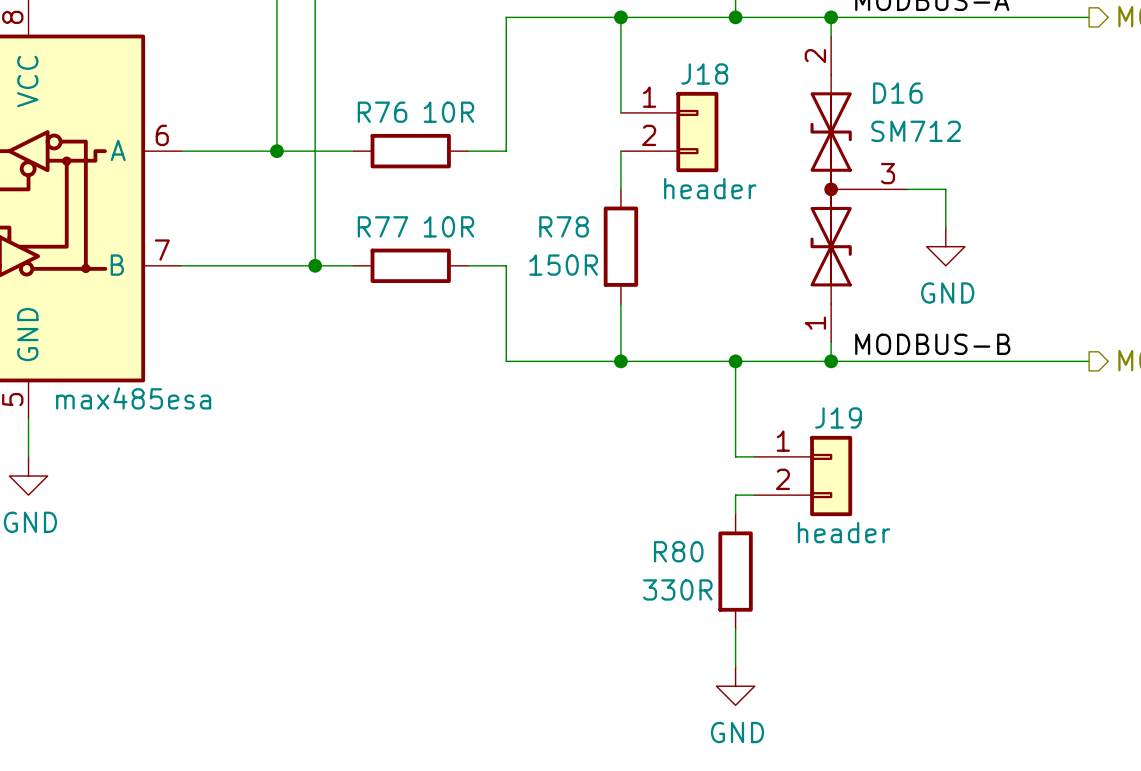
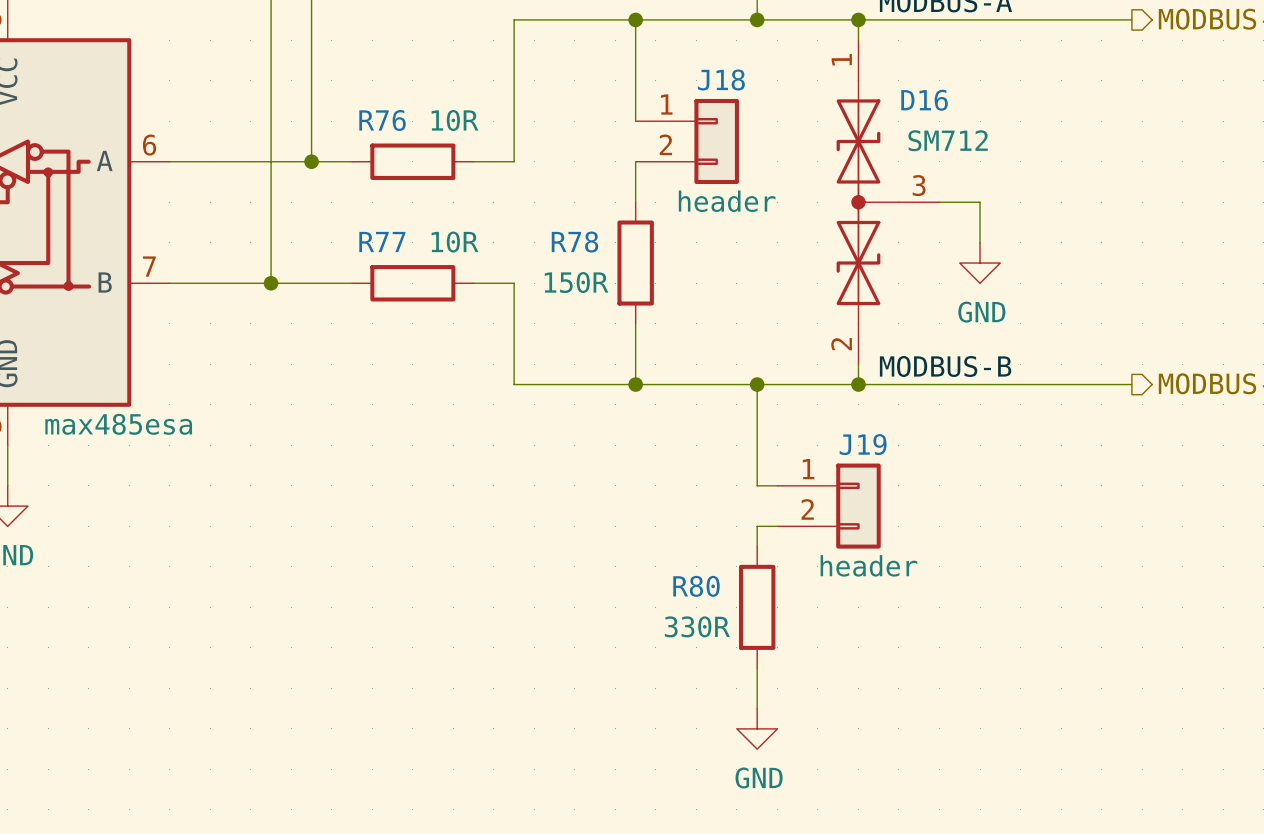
junction position: (276, 151) -> (311, 161)
wire: (315, 151) (315, 265) -> (271, 161) (271, 283)
D16 flip: as is (839, 189) -> up-down (867, 202)
junction position: (315, 265) -> (271, 283)

